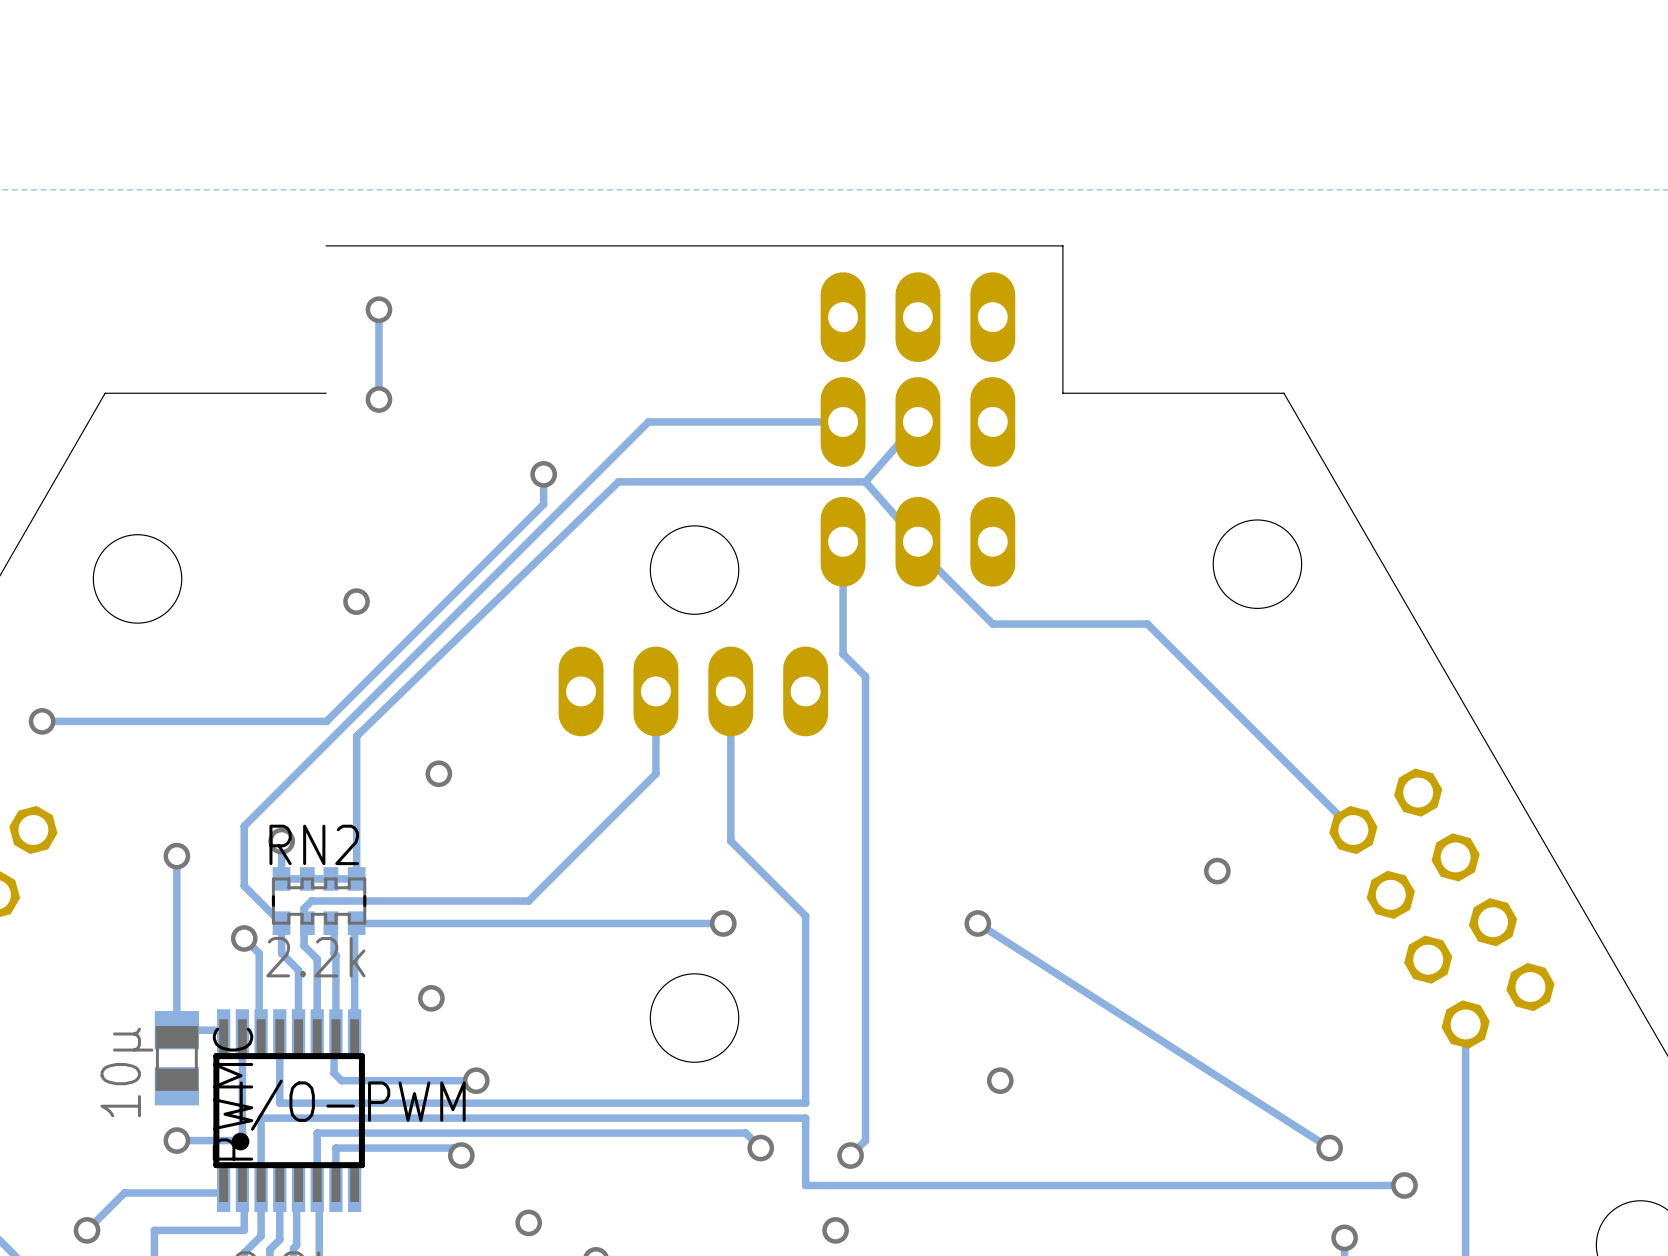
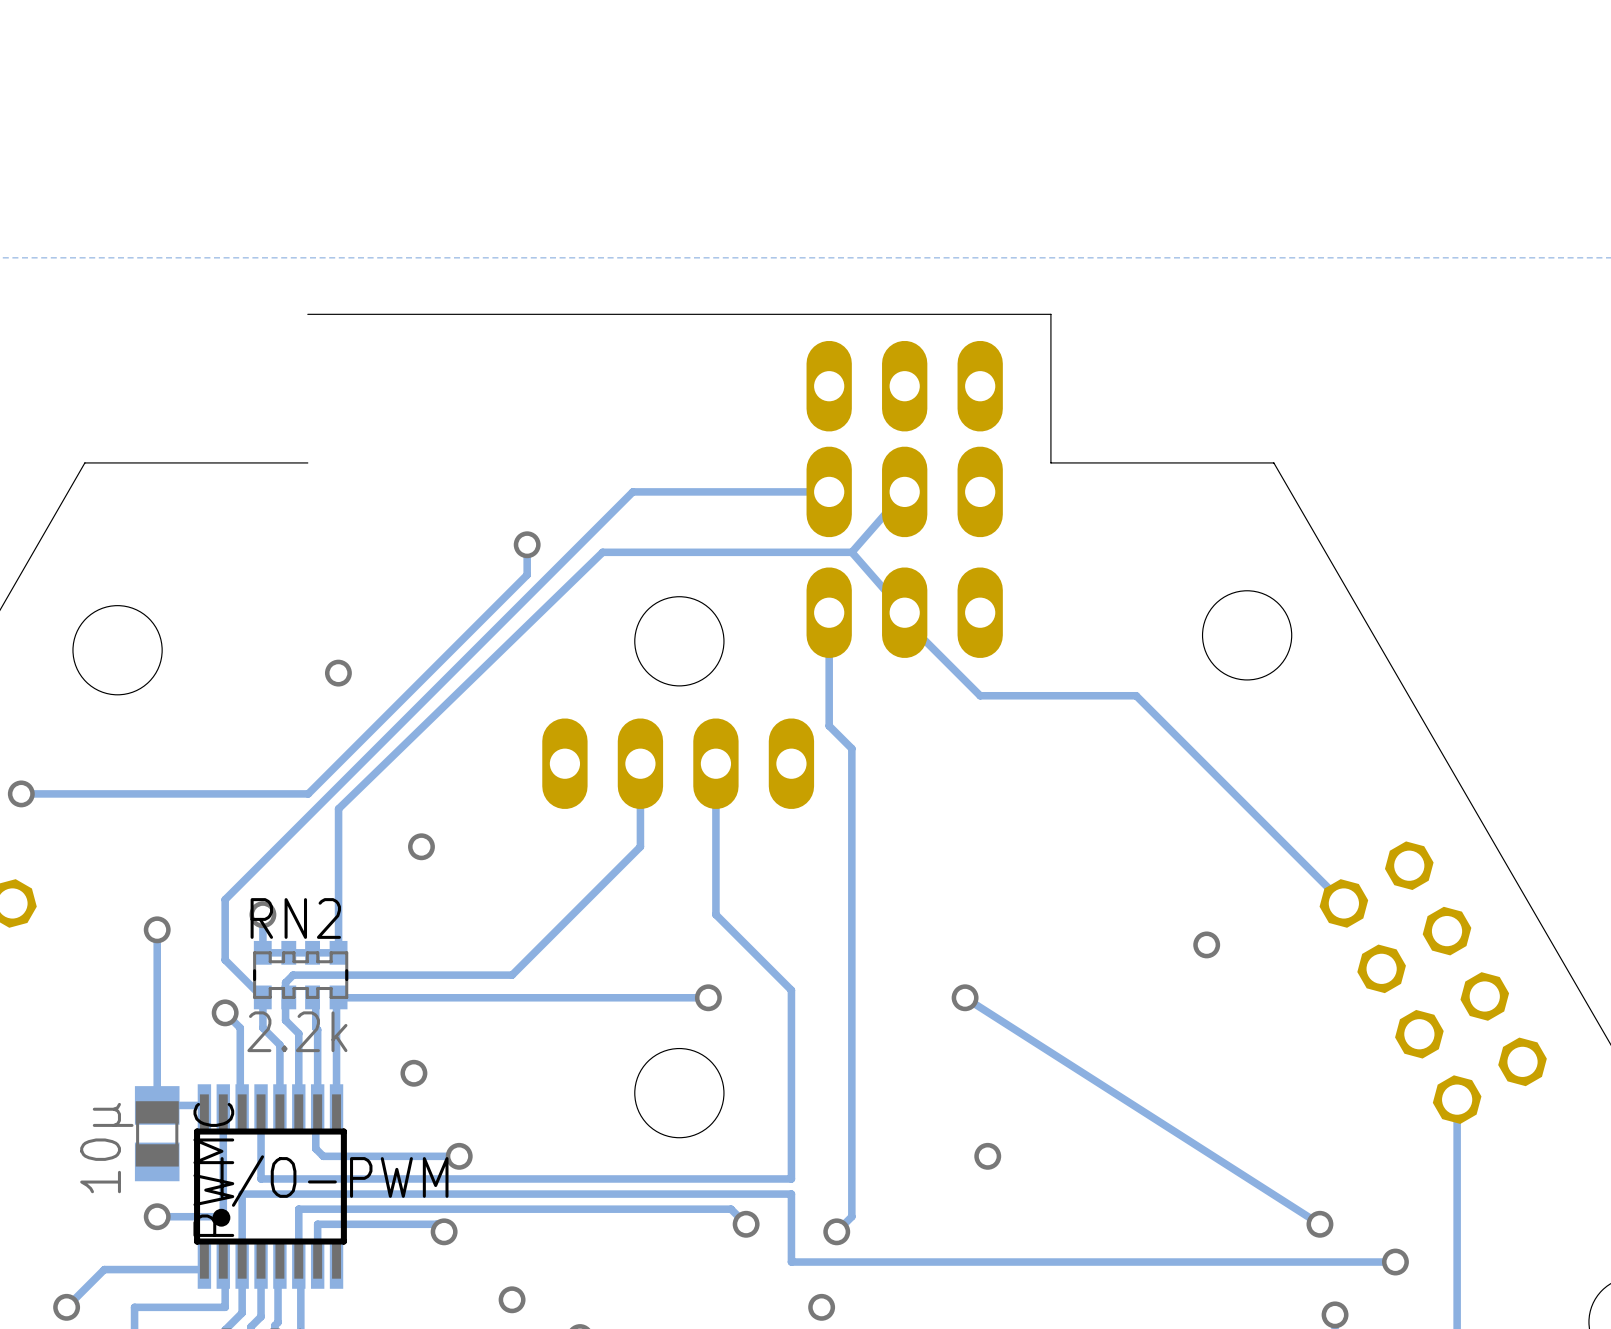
track: (378, 309) (378, 399) -> none
via: (378, 309) -> none
via: (378, 399) -> none

